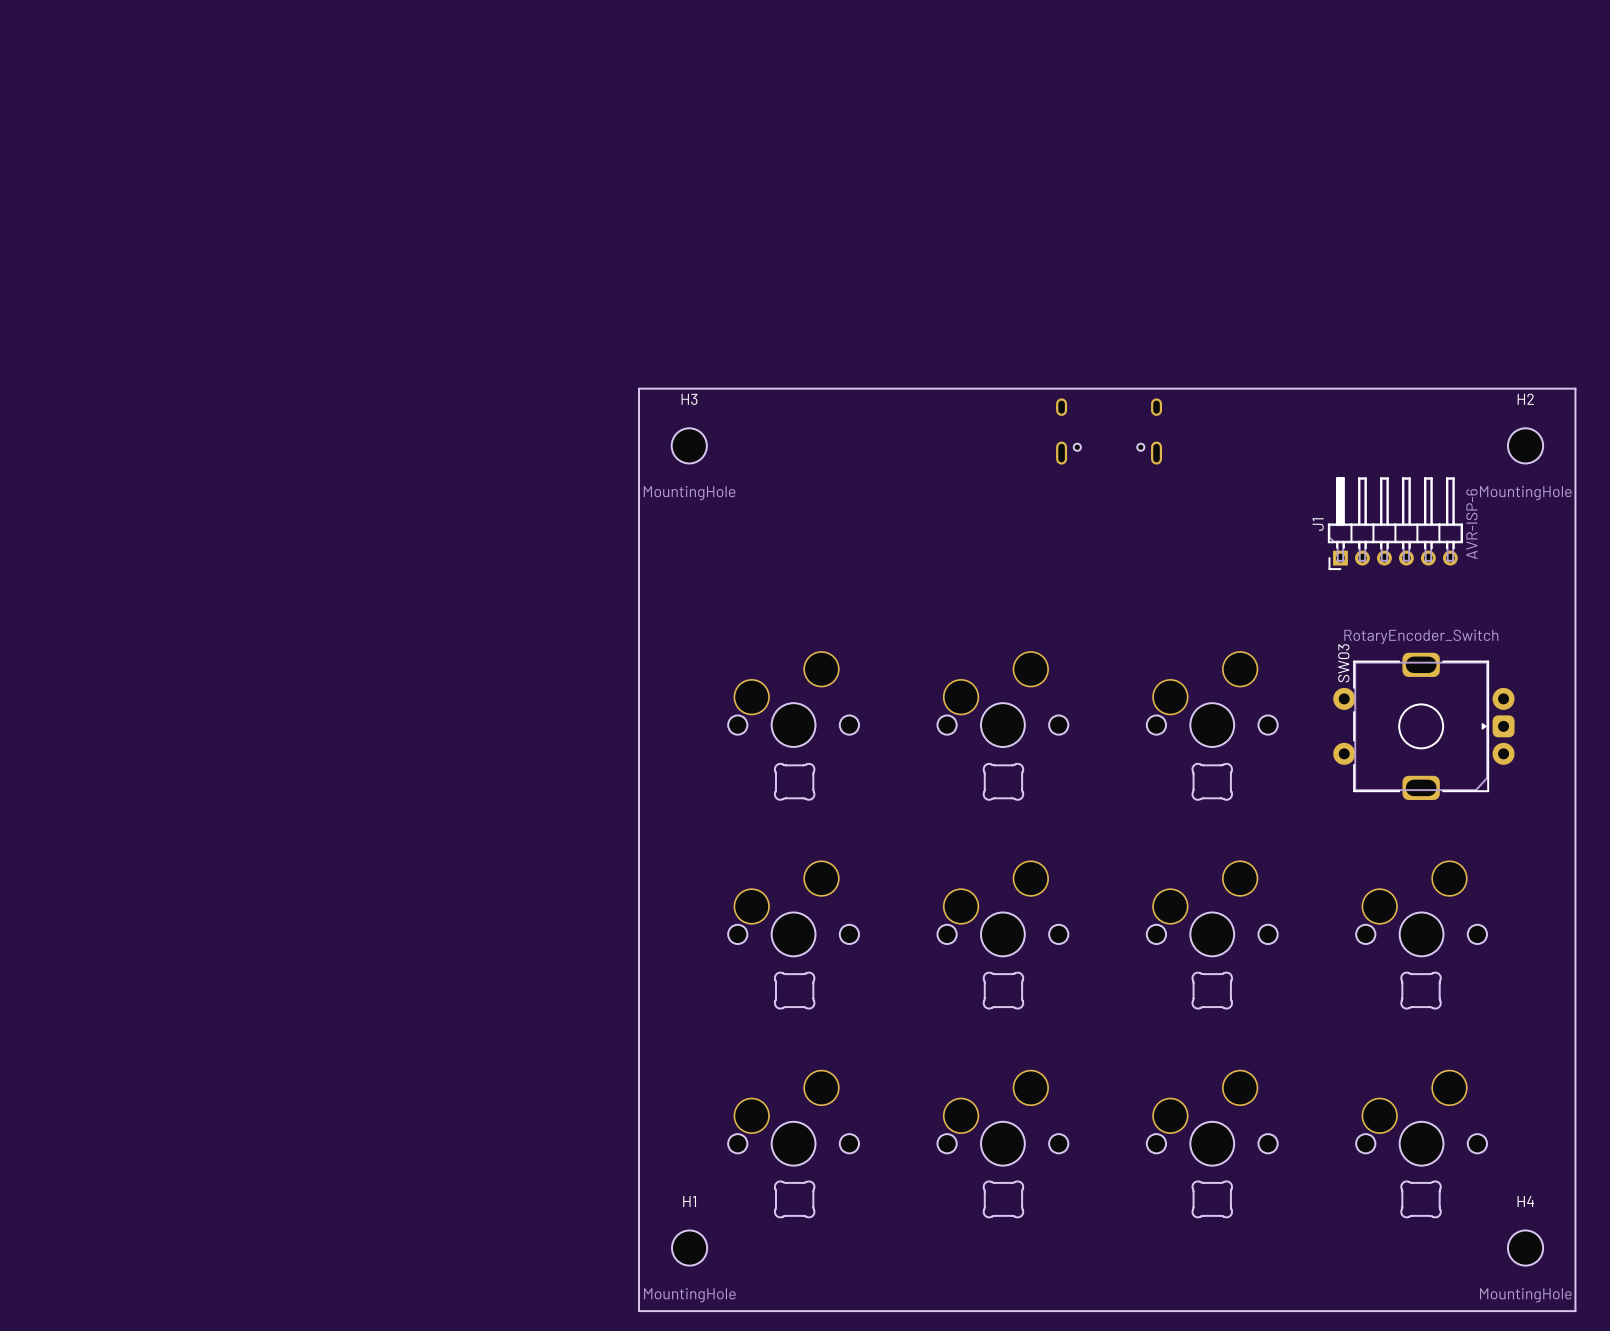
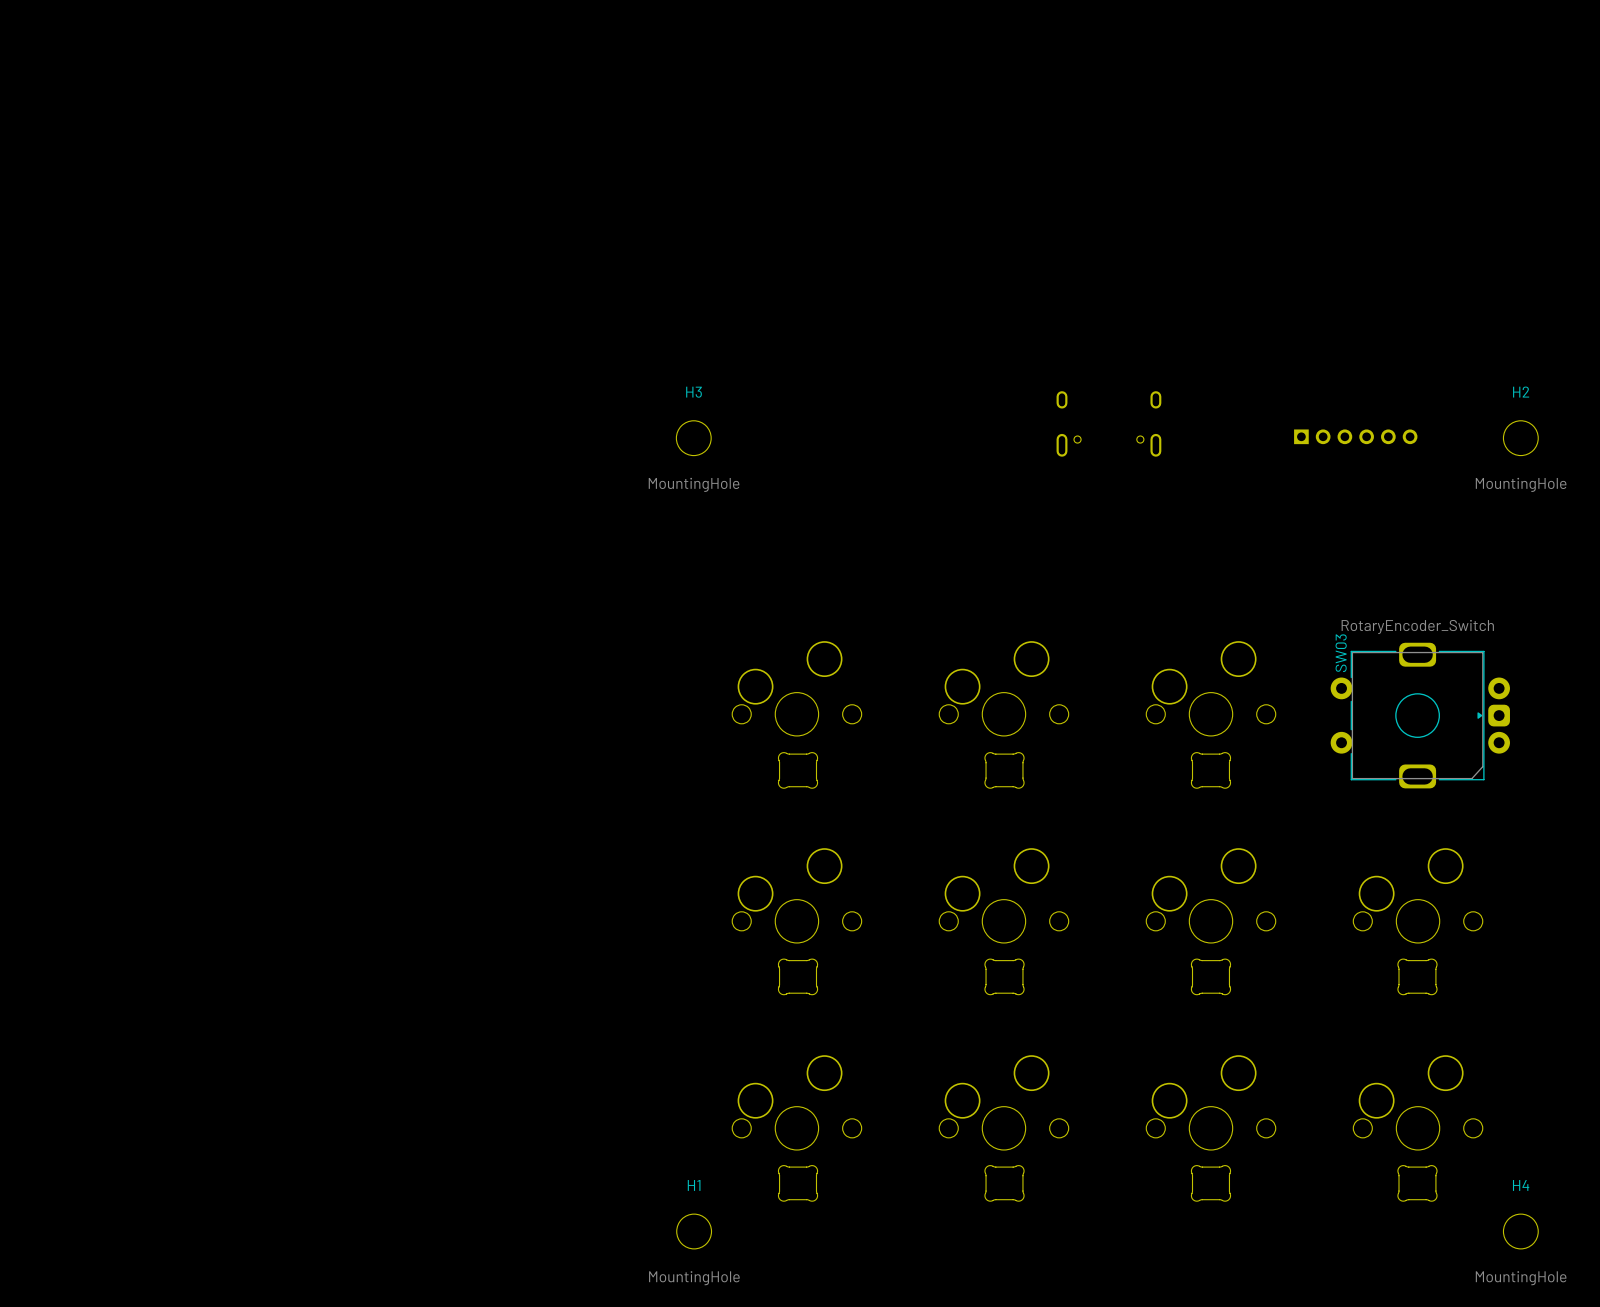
board edge: (639, 388) (1575, 388) (1575, 1311) (639, 1311) (639, 388) -> none
J1 side: top (1395, 523) -> bottom (1355, 436)

